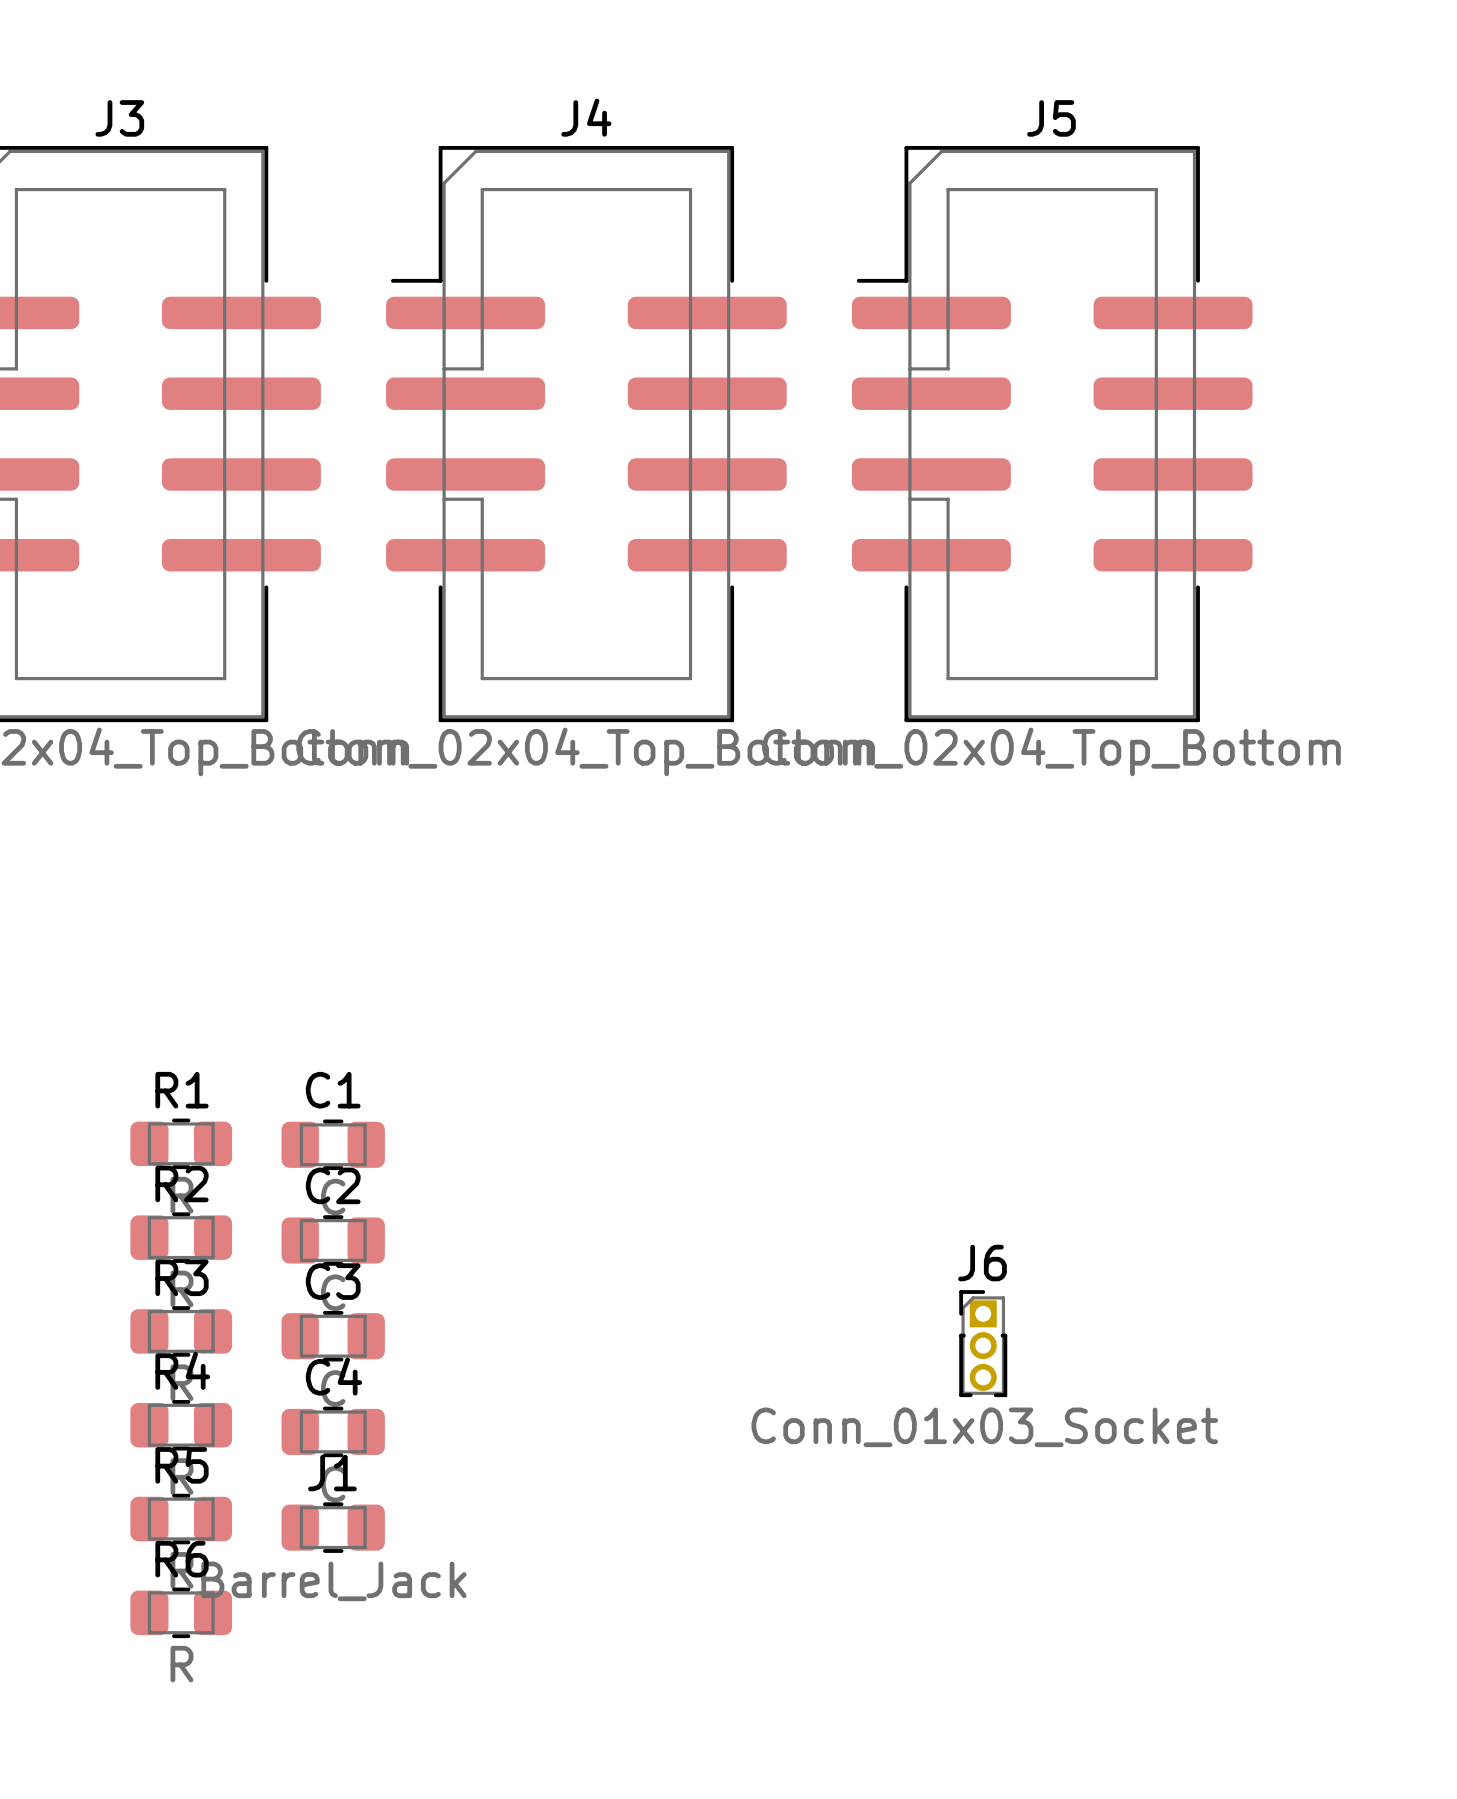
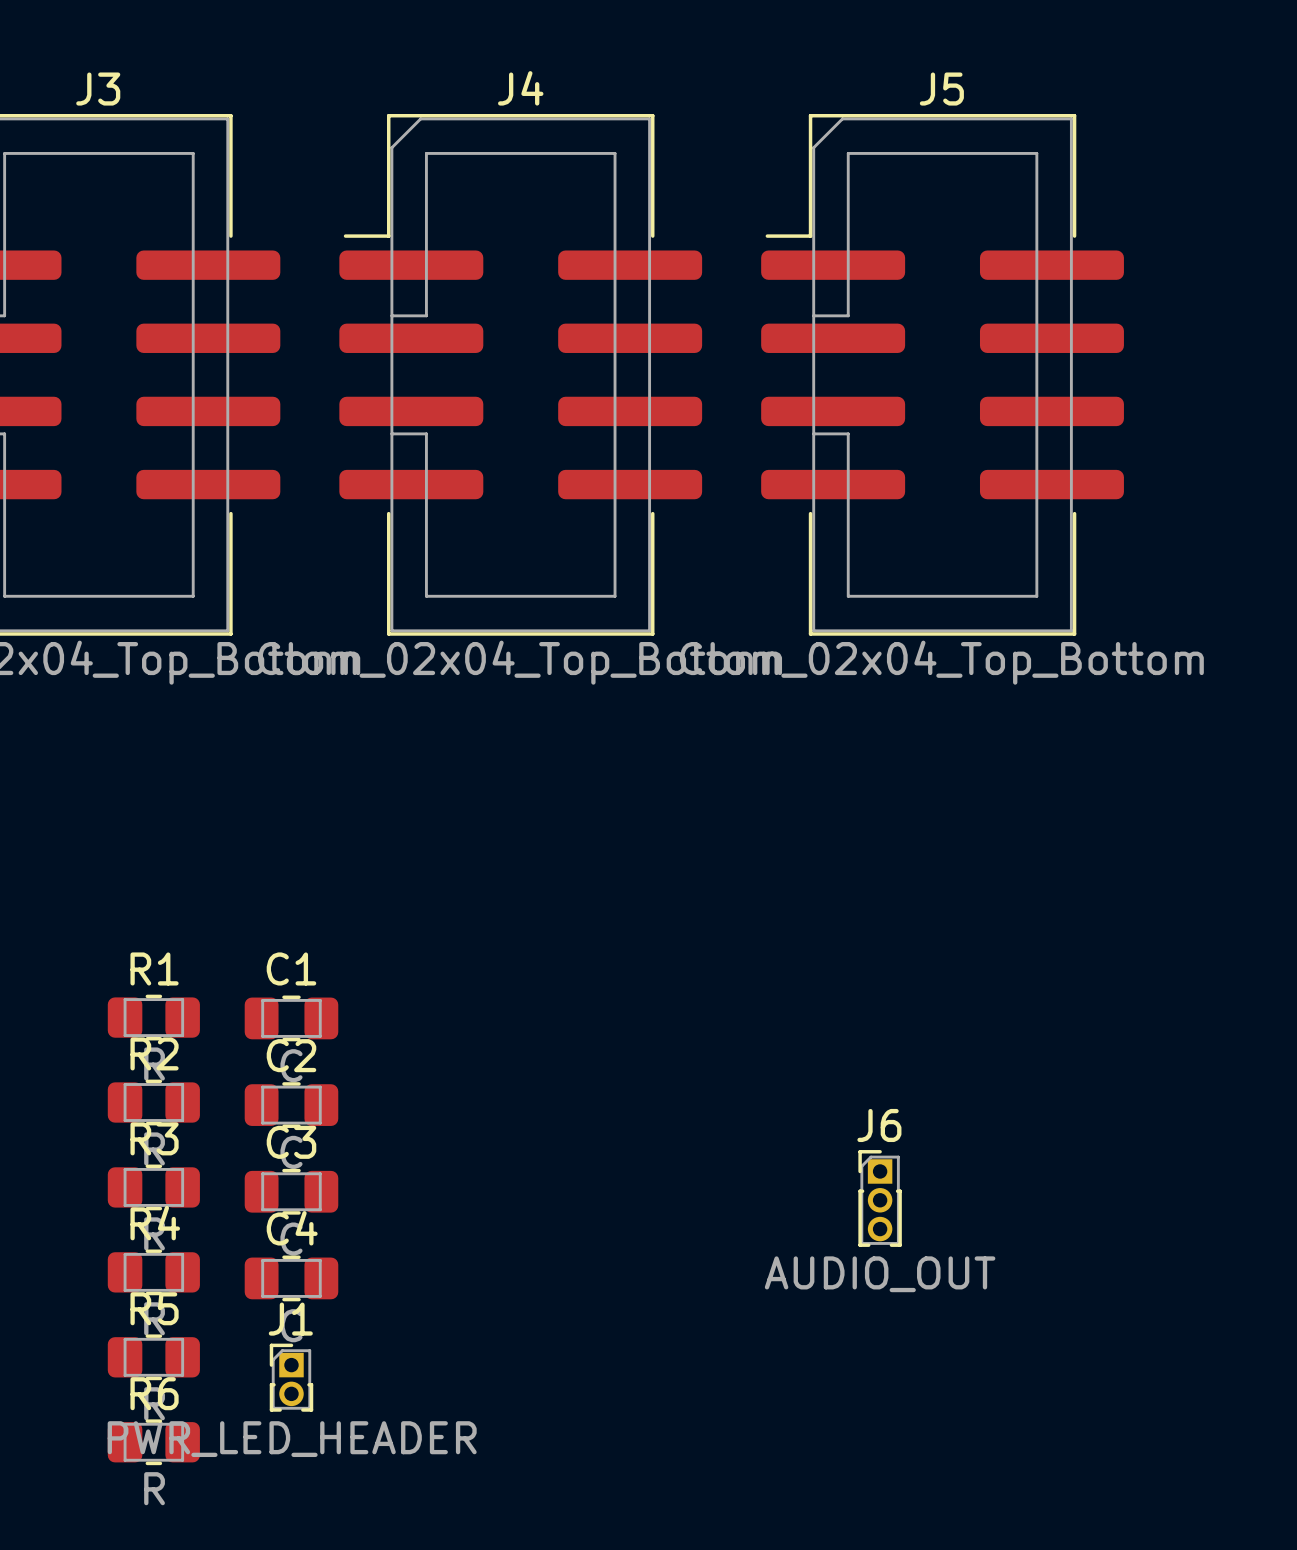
J6 value: Conn_01x03_Socket (984, 1427) -> AUDIO_OUT (880, 1274)
J1 footprint: [281, 1502, 385, 1553] -> [269, 1343, 314, 1412]
J1 value: Barrel_Jack (333, 1581) -> PWR_LED_HEADER (292, 1439)

